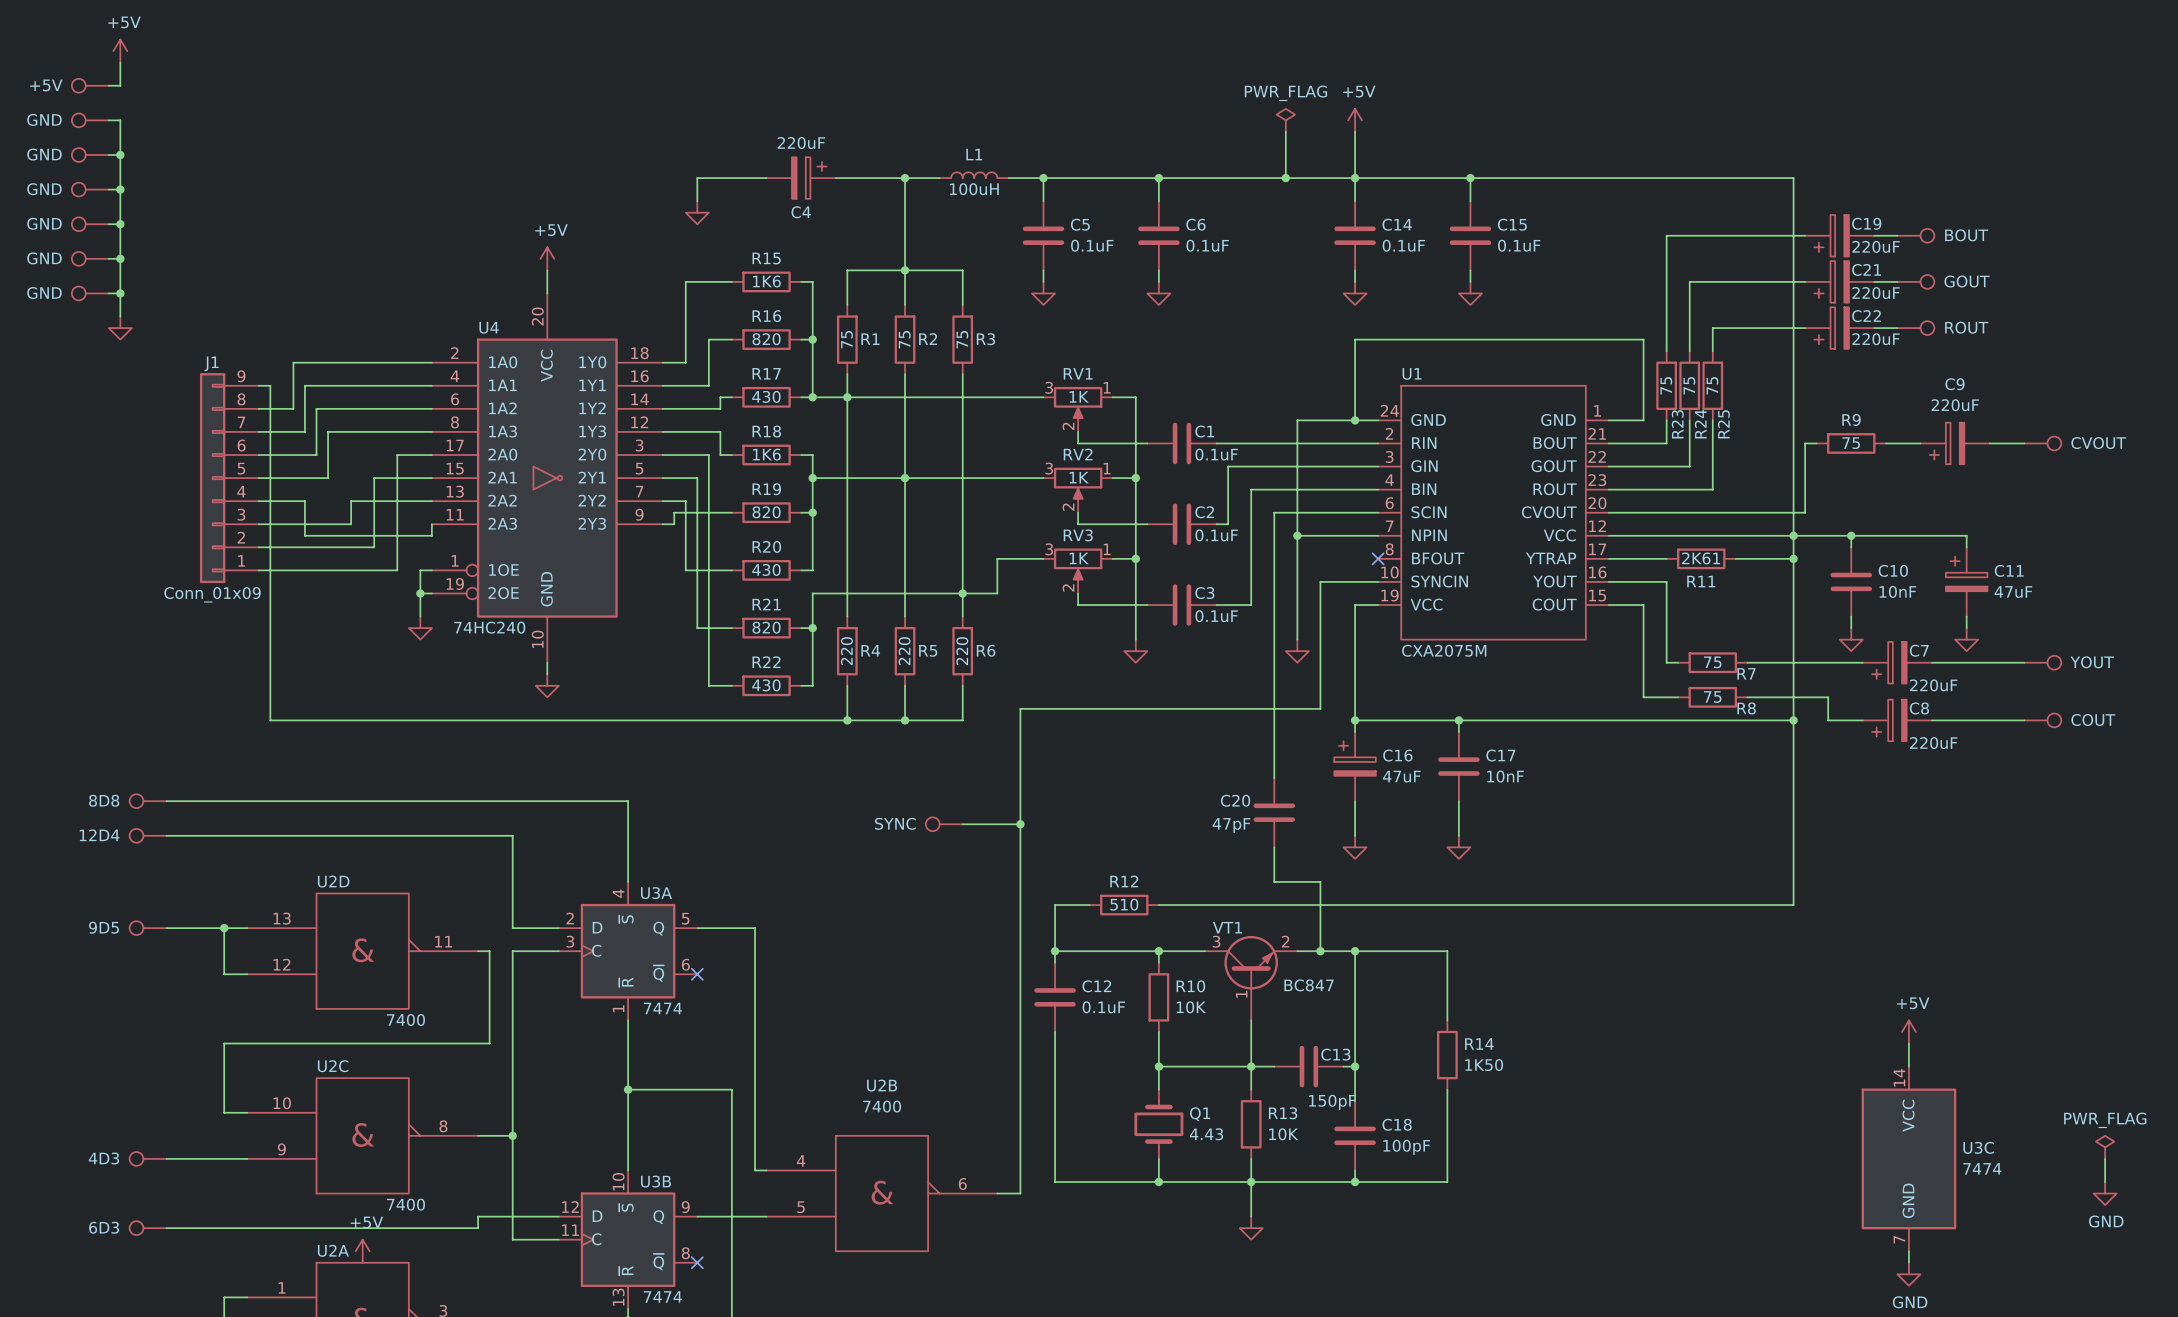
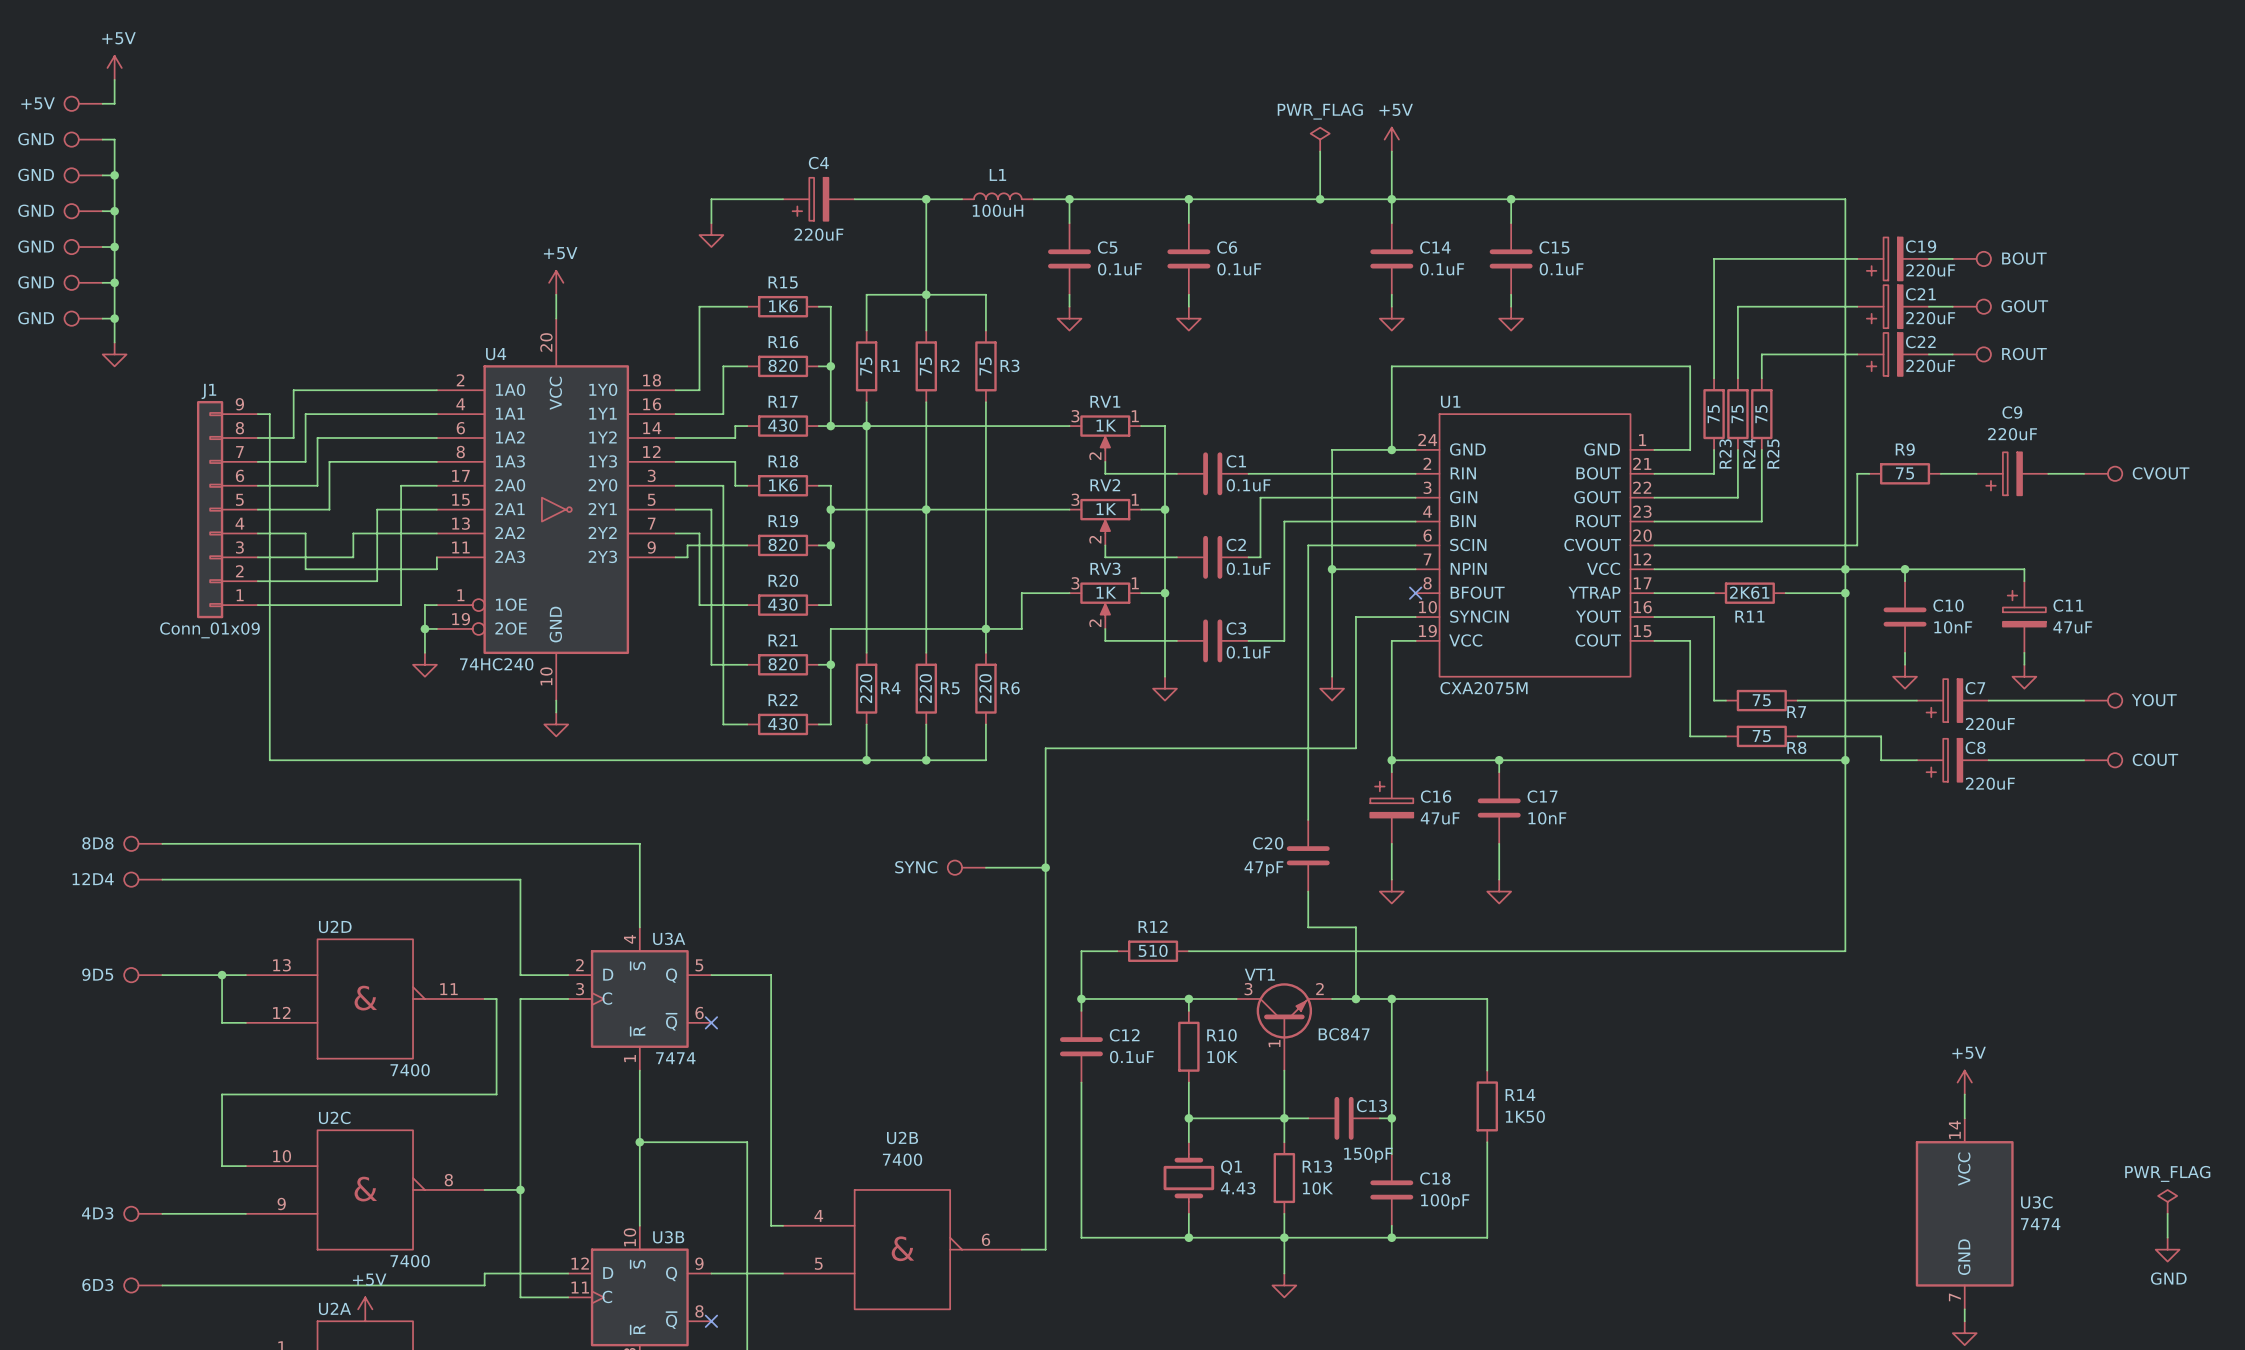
C4 rotation: 0° (809, 178) -> 180° (810, 199)

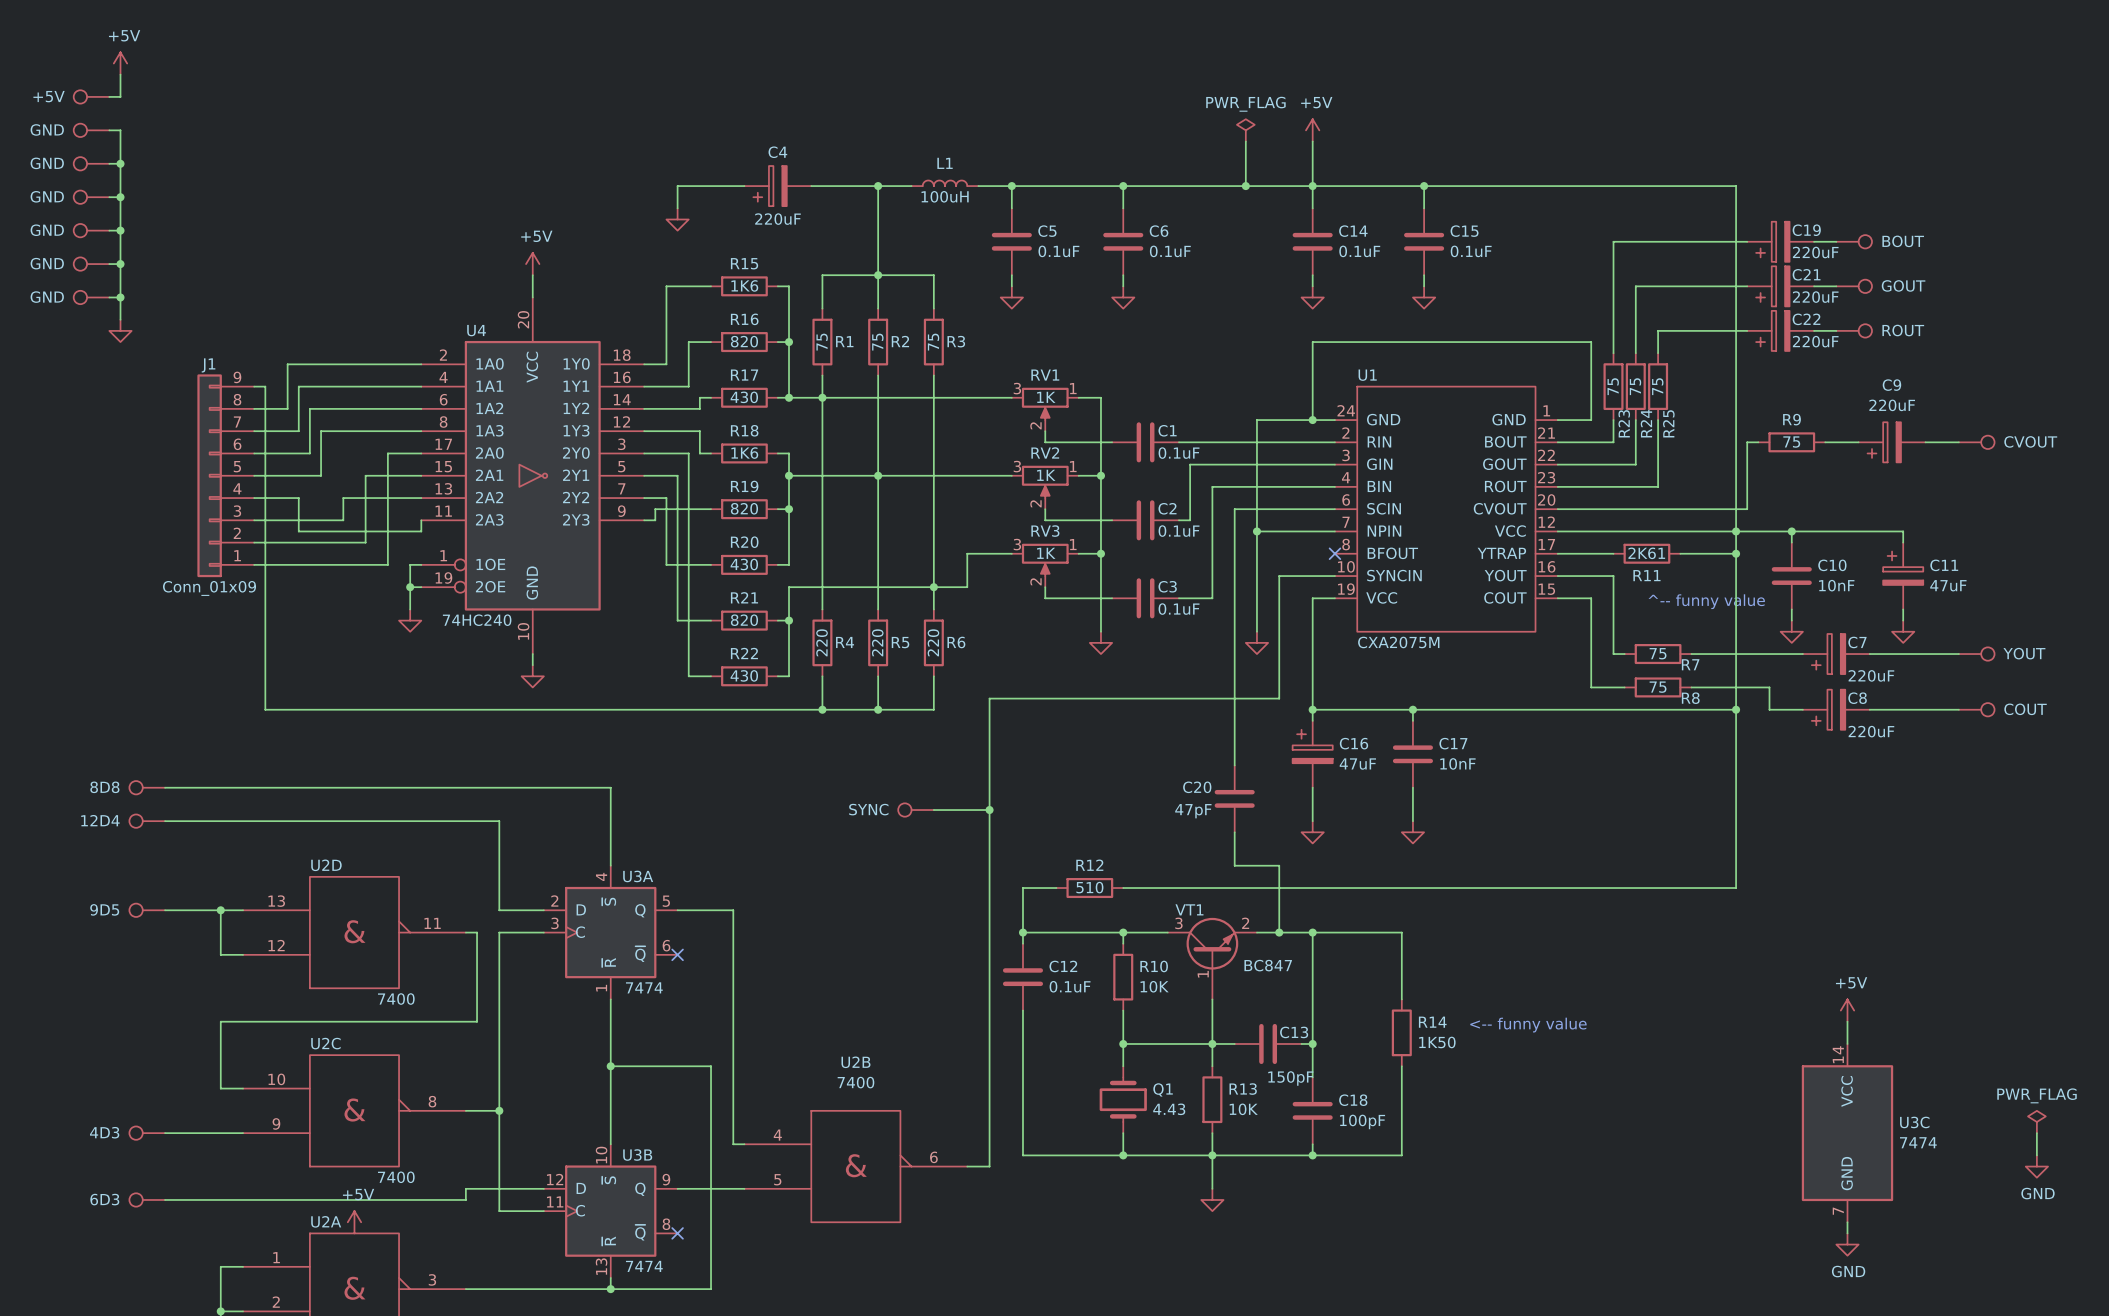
text: none -> ^-- funny value (1706, 601)
text: none -> <-- funny value (1528, 1025)

